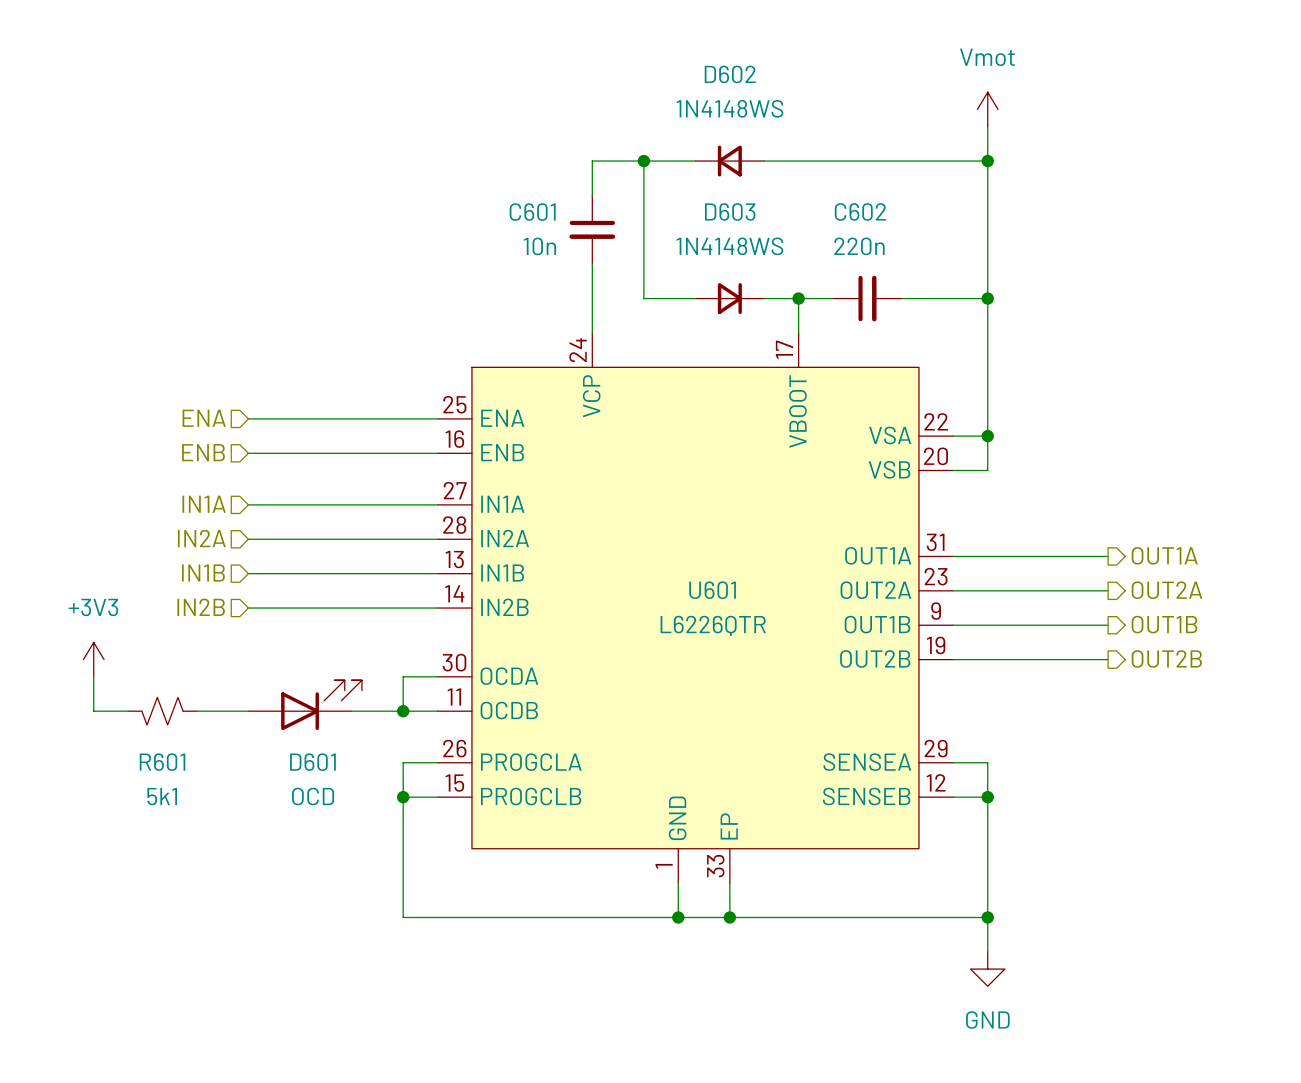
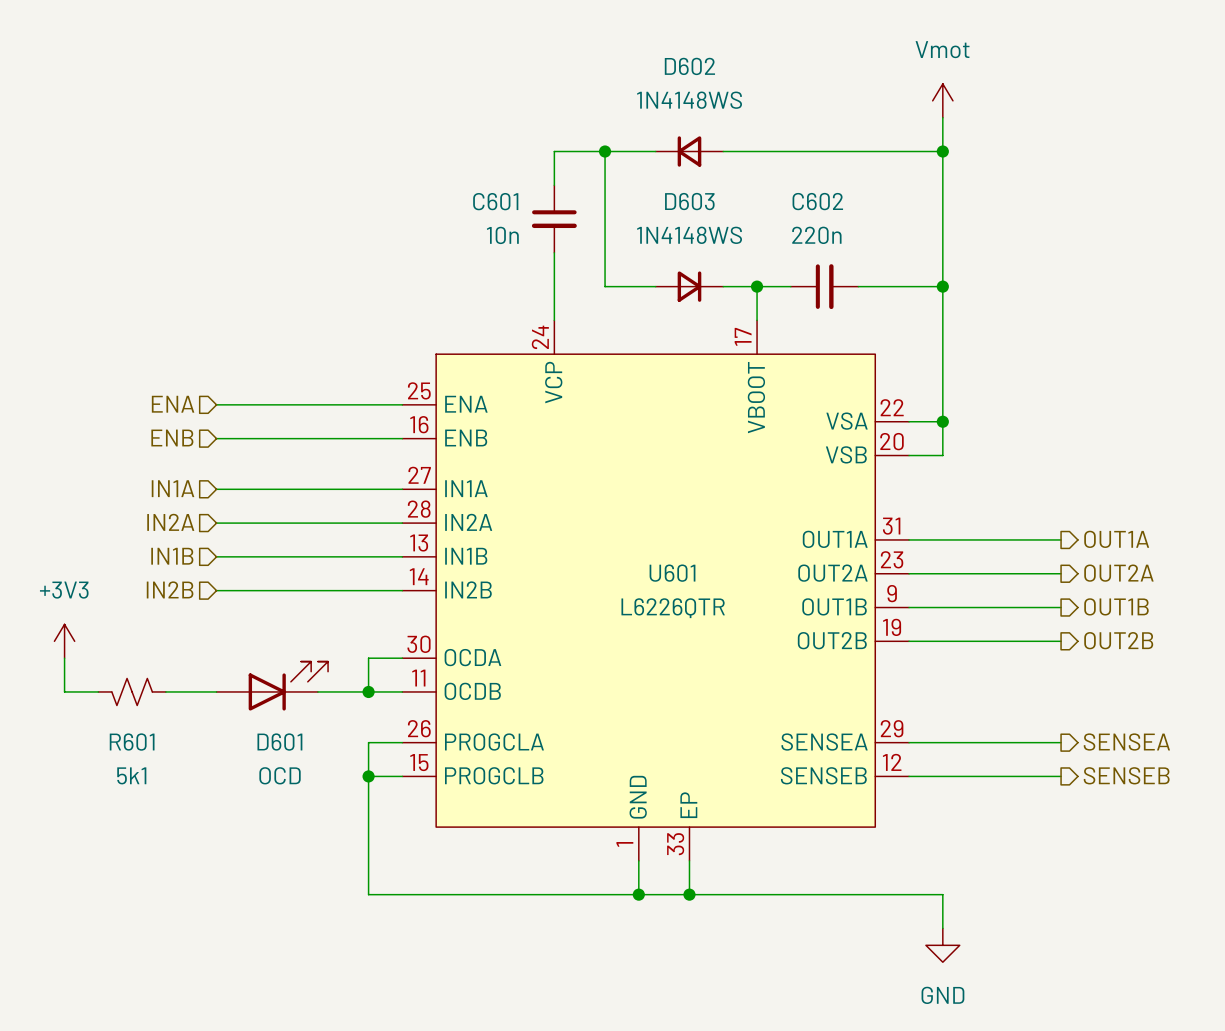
wire: (987, 762) (987, 917) -> (942, 742) (1061, 742)
hierarchical label: none -> SENSEA (1126, 742)
hierarchical label: none -> SENSEB (1126, 775)
wire: none -> (942, 776) (1061, 776)
junction: (987, 797) -> none
junction: (987, 917) -> none

